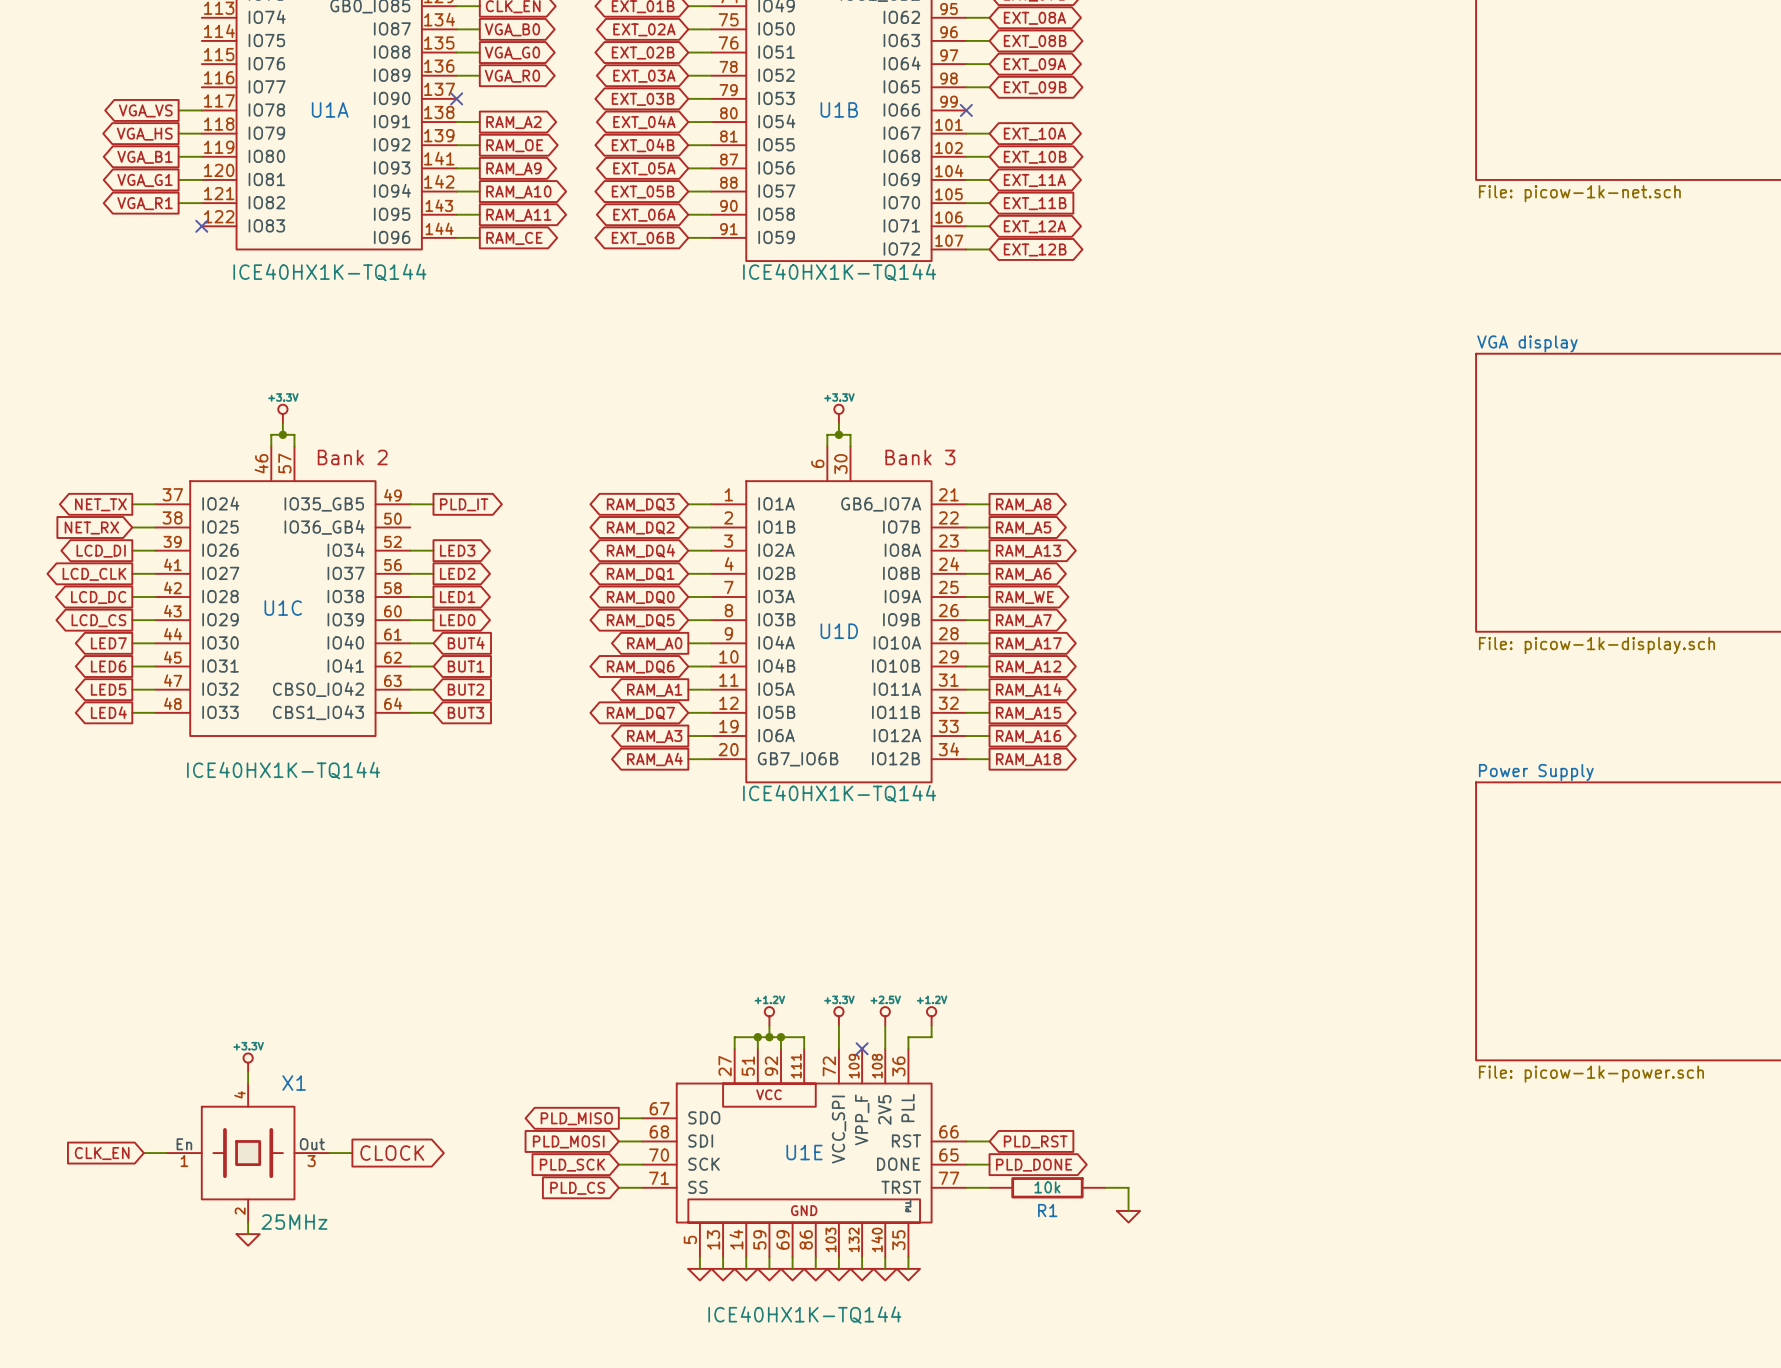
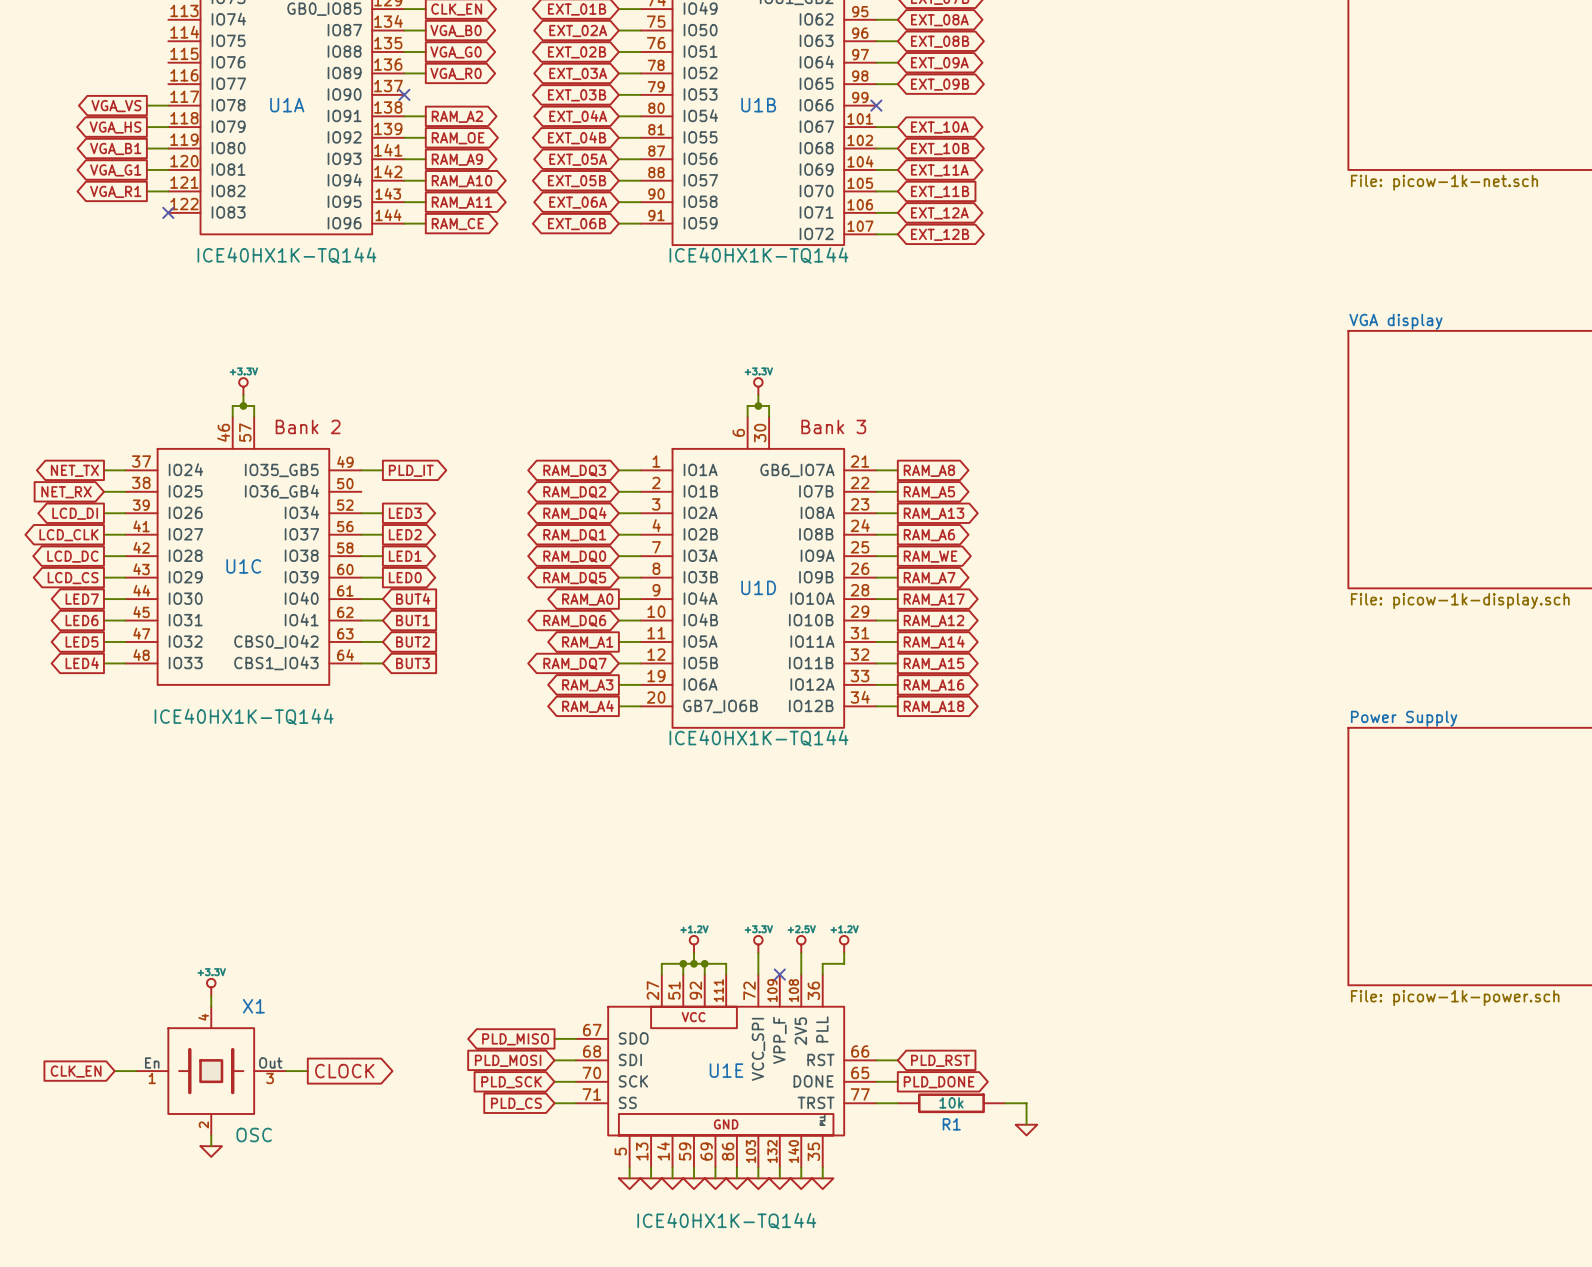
X1 value: 25MHz (294, 1222) -> OSC (254, 1134)

